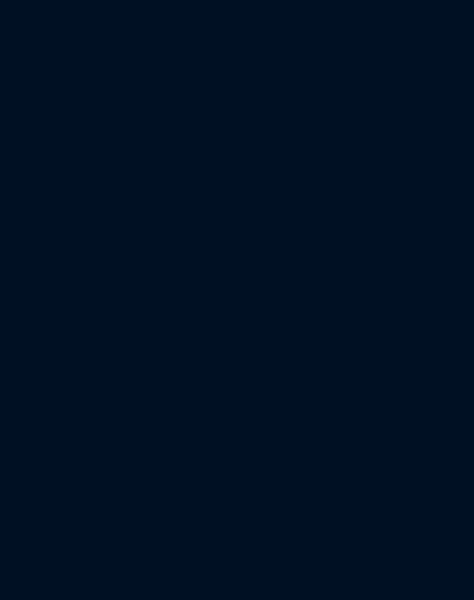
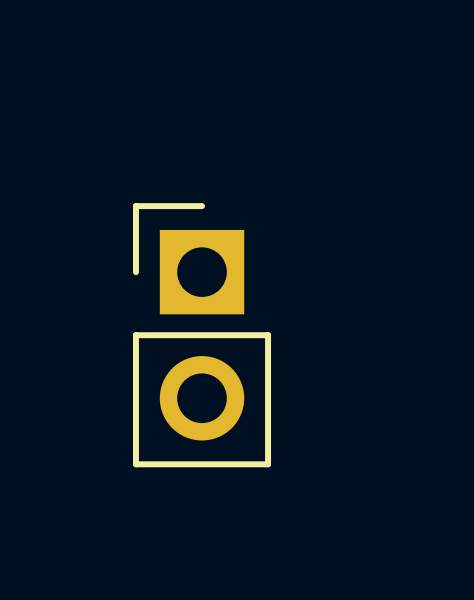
part: none -> (202, 335)

